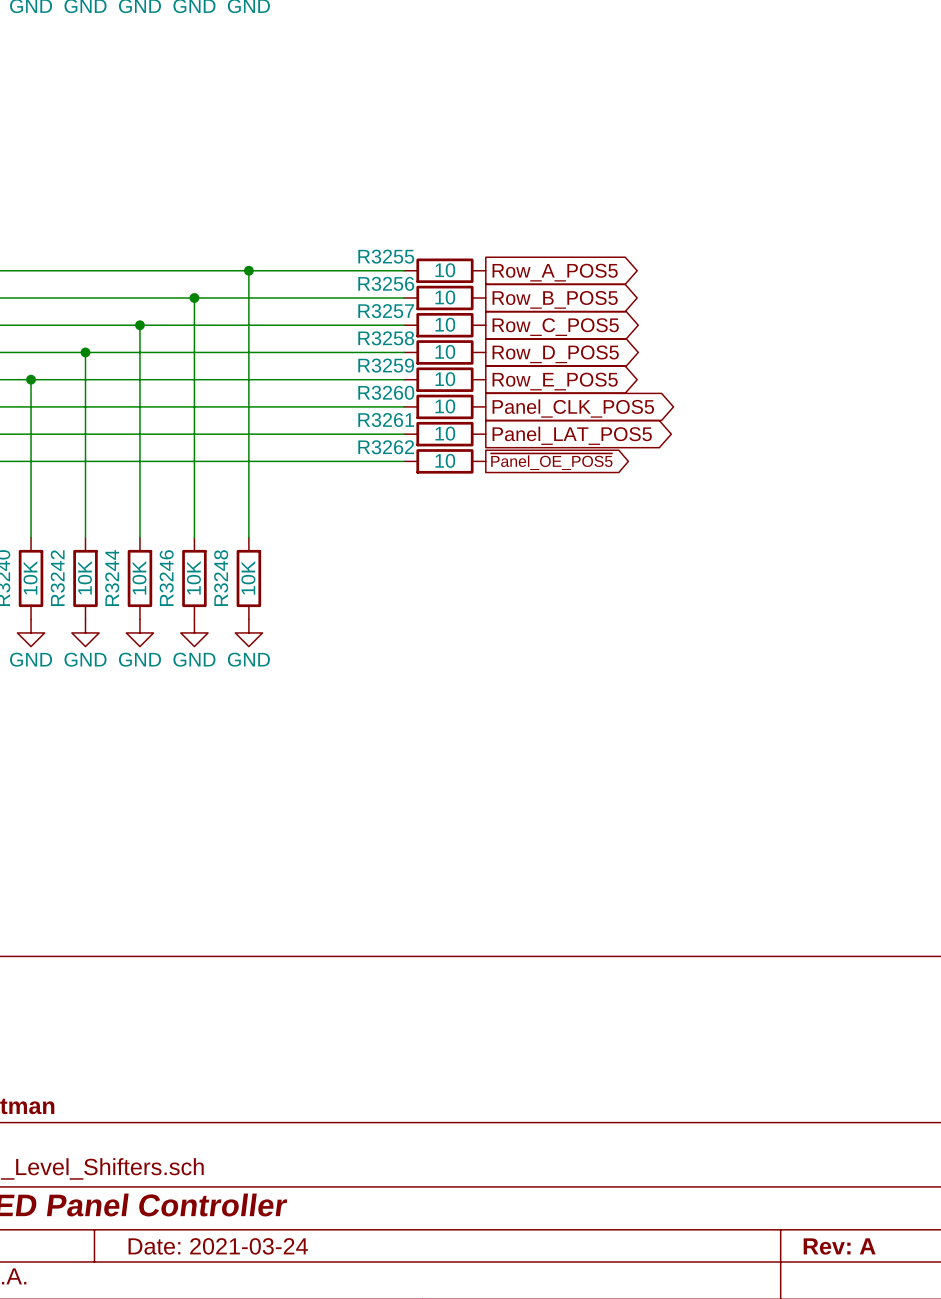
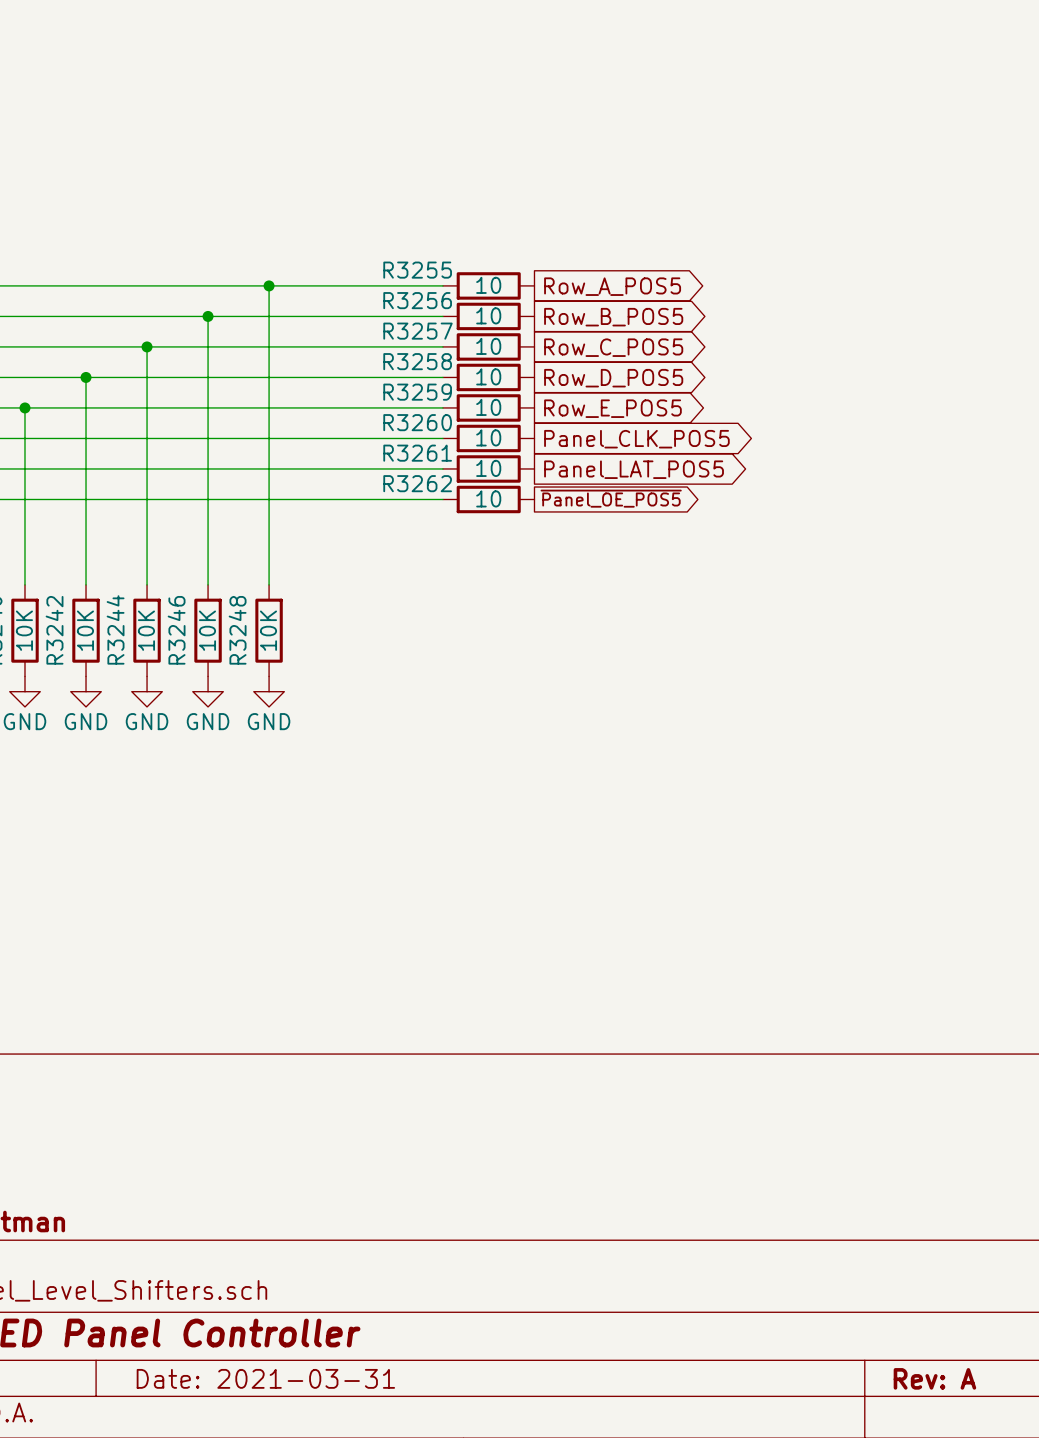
title block: Date: 2021-03-24 (218, 1246) -> Date: 2021-03-31 (265, 1378)

